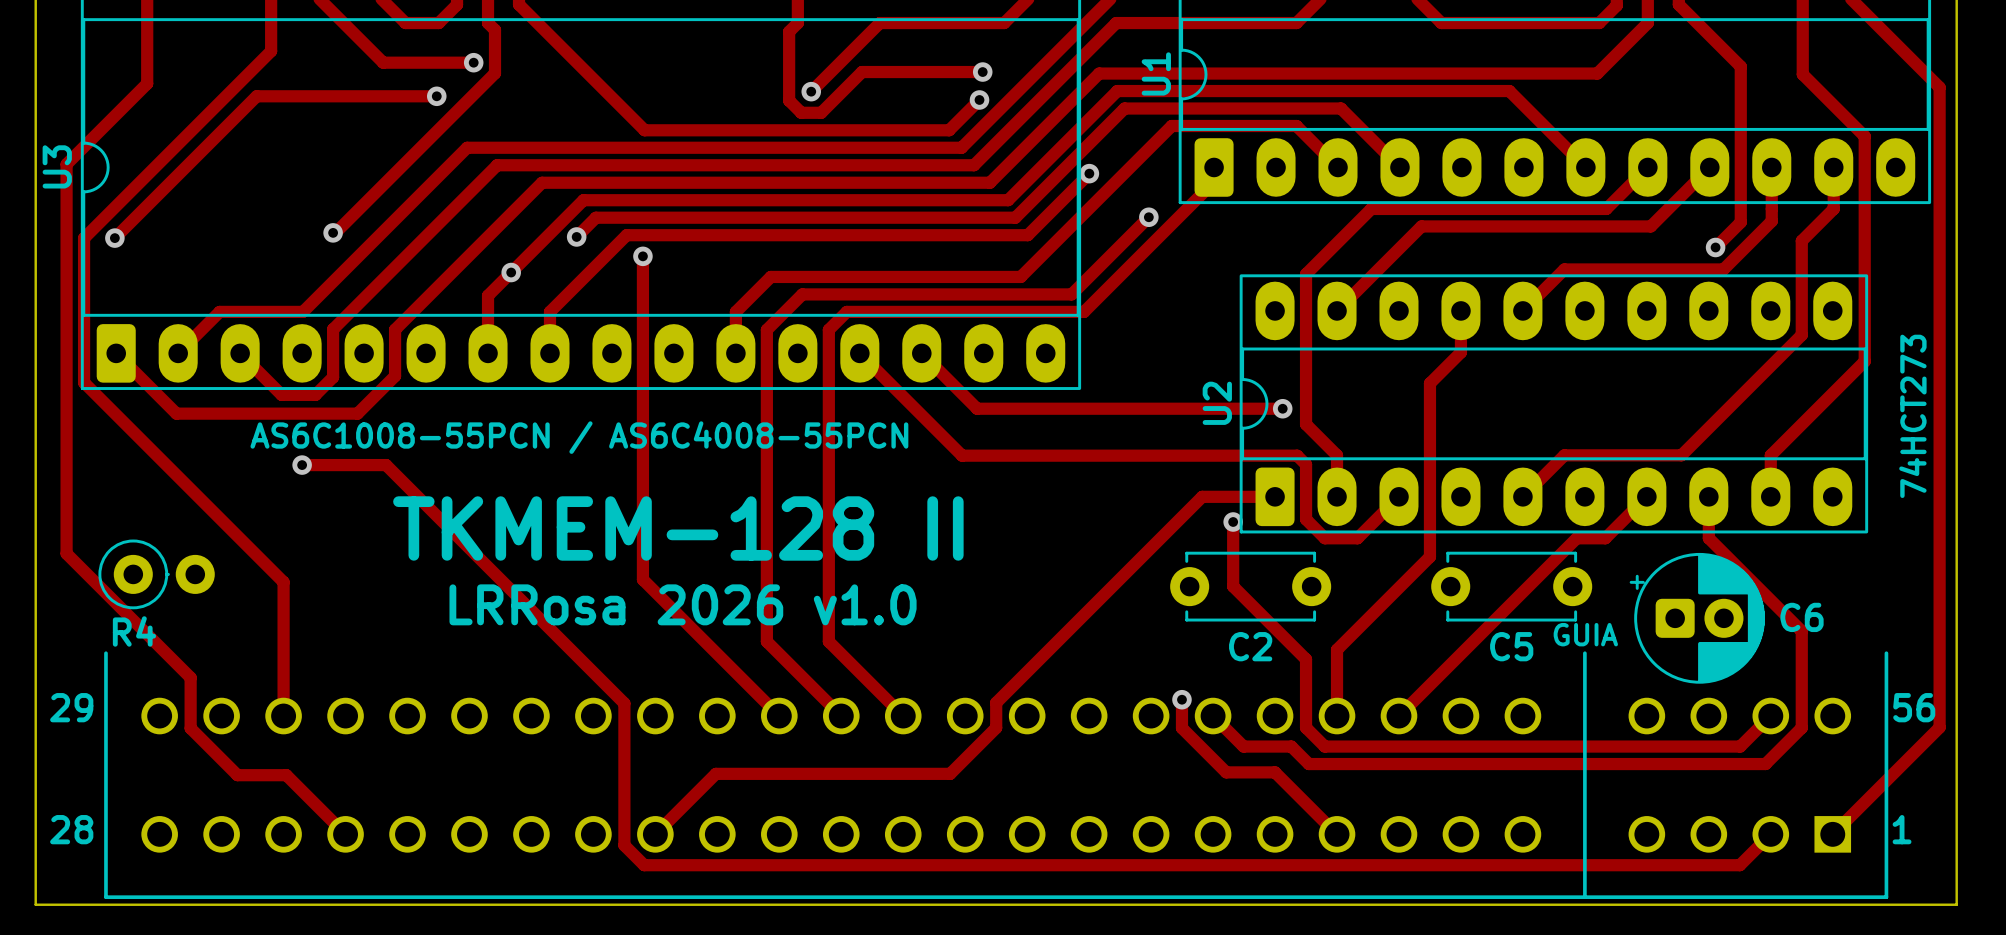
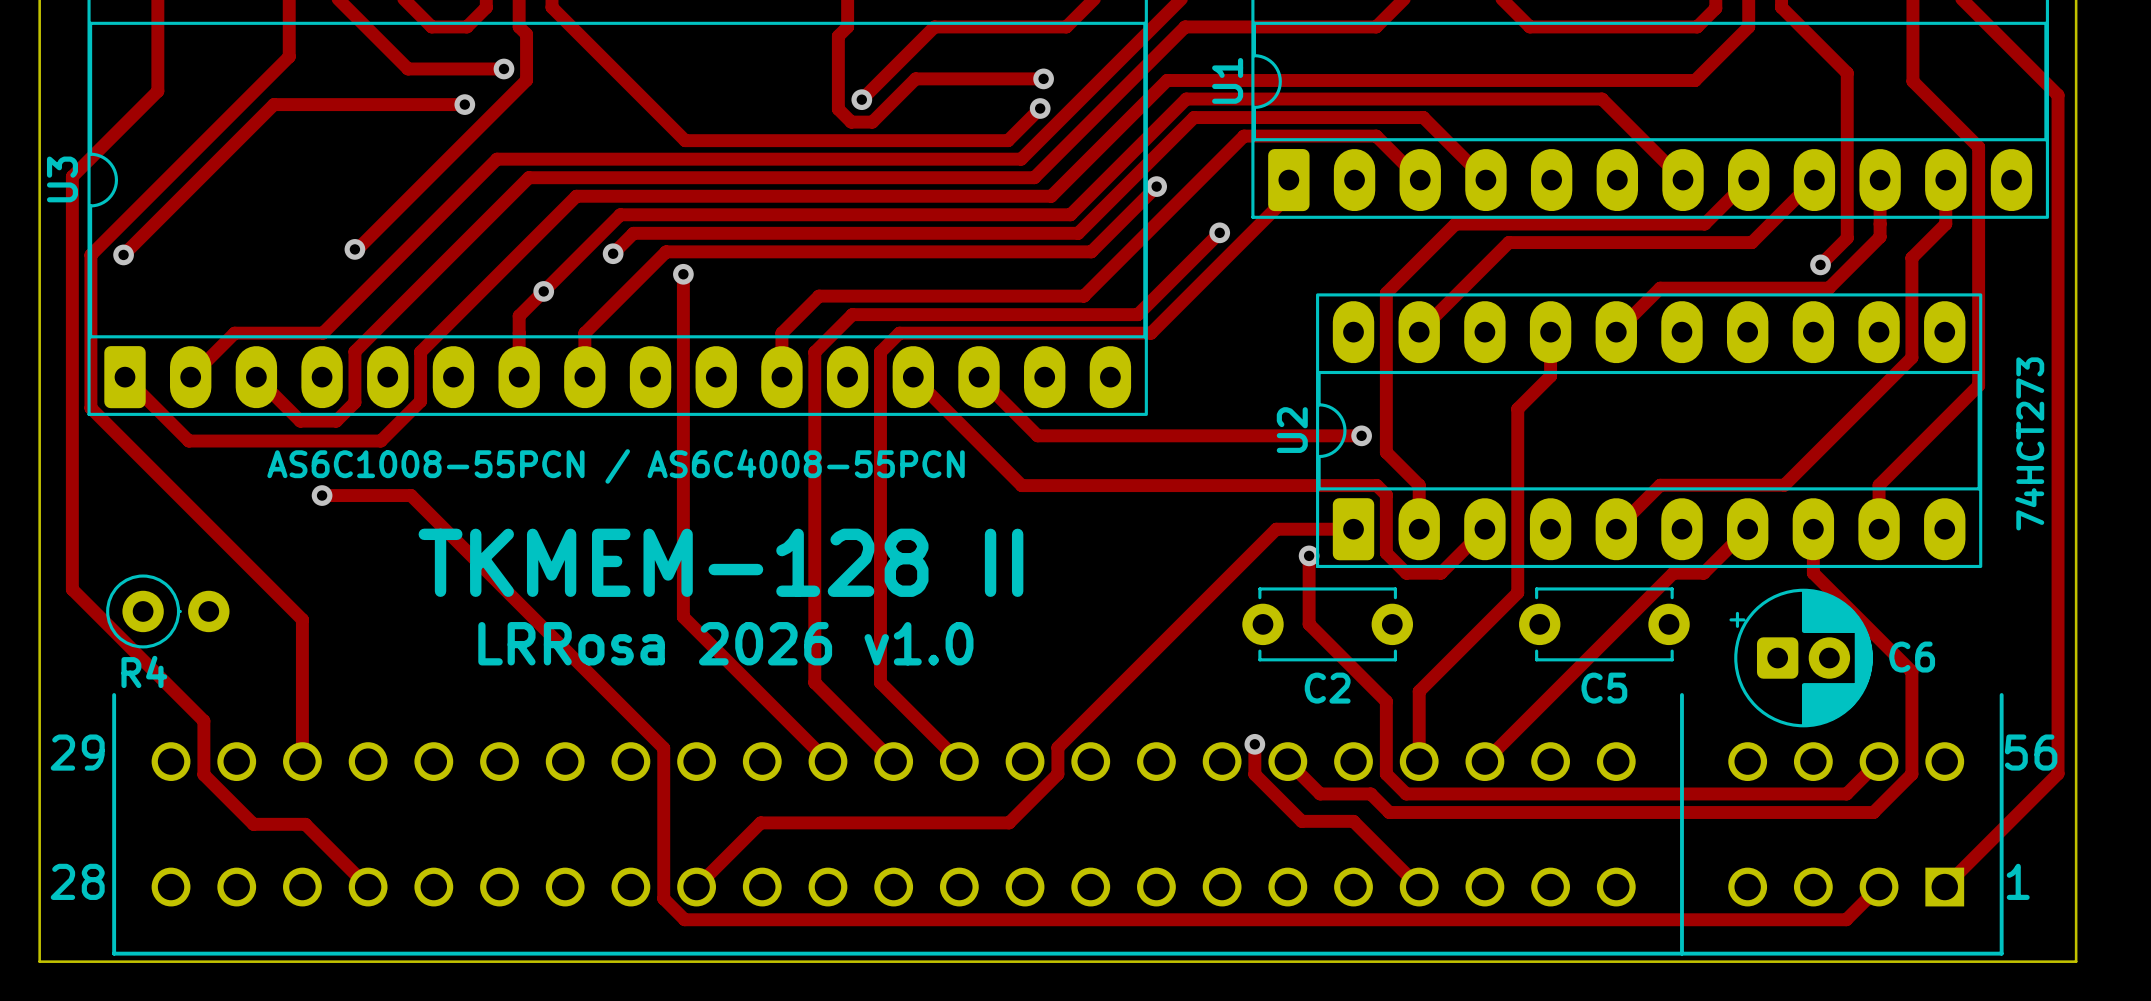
part footprint: [104, 651, 1889, 900] -> [112, 693, 2004, 956]

